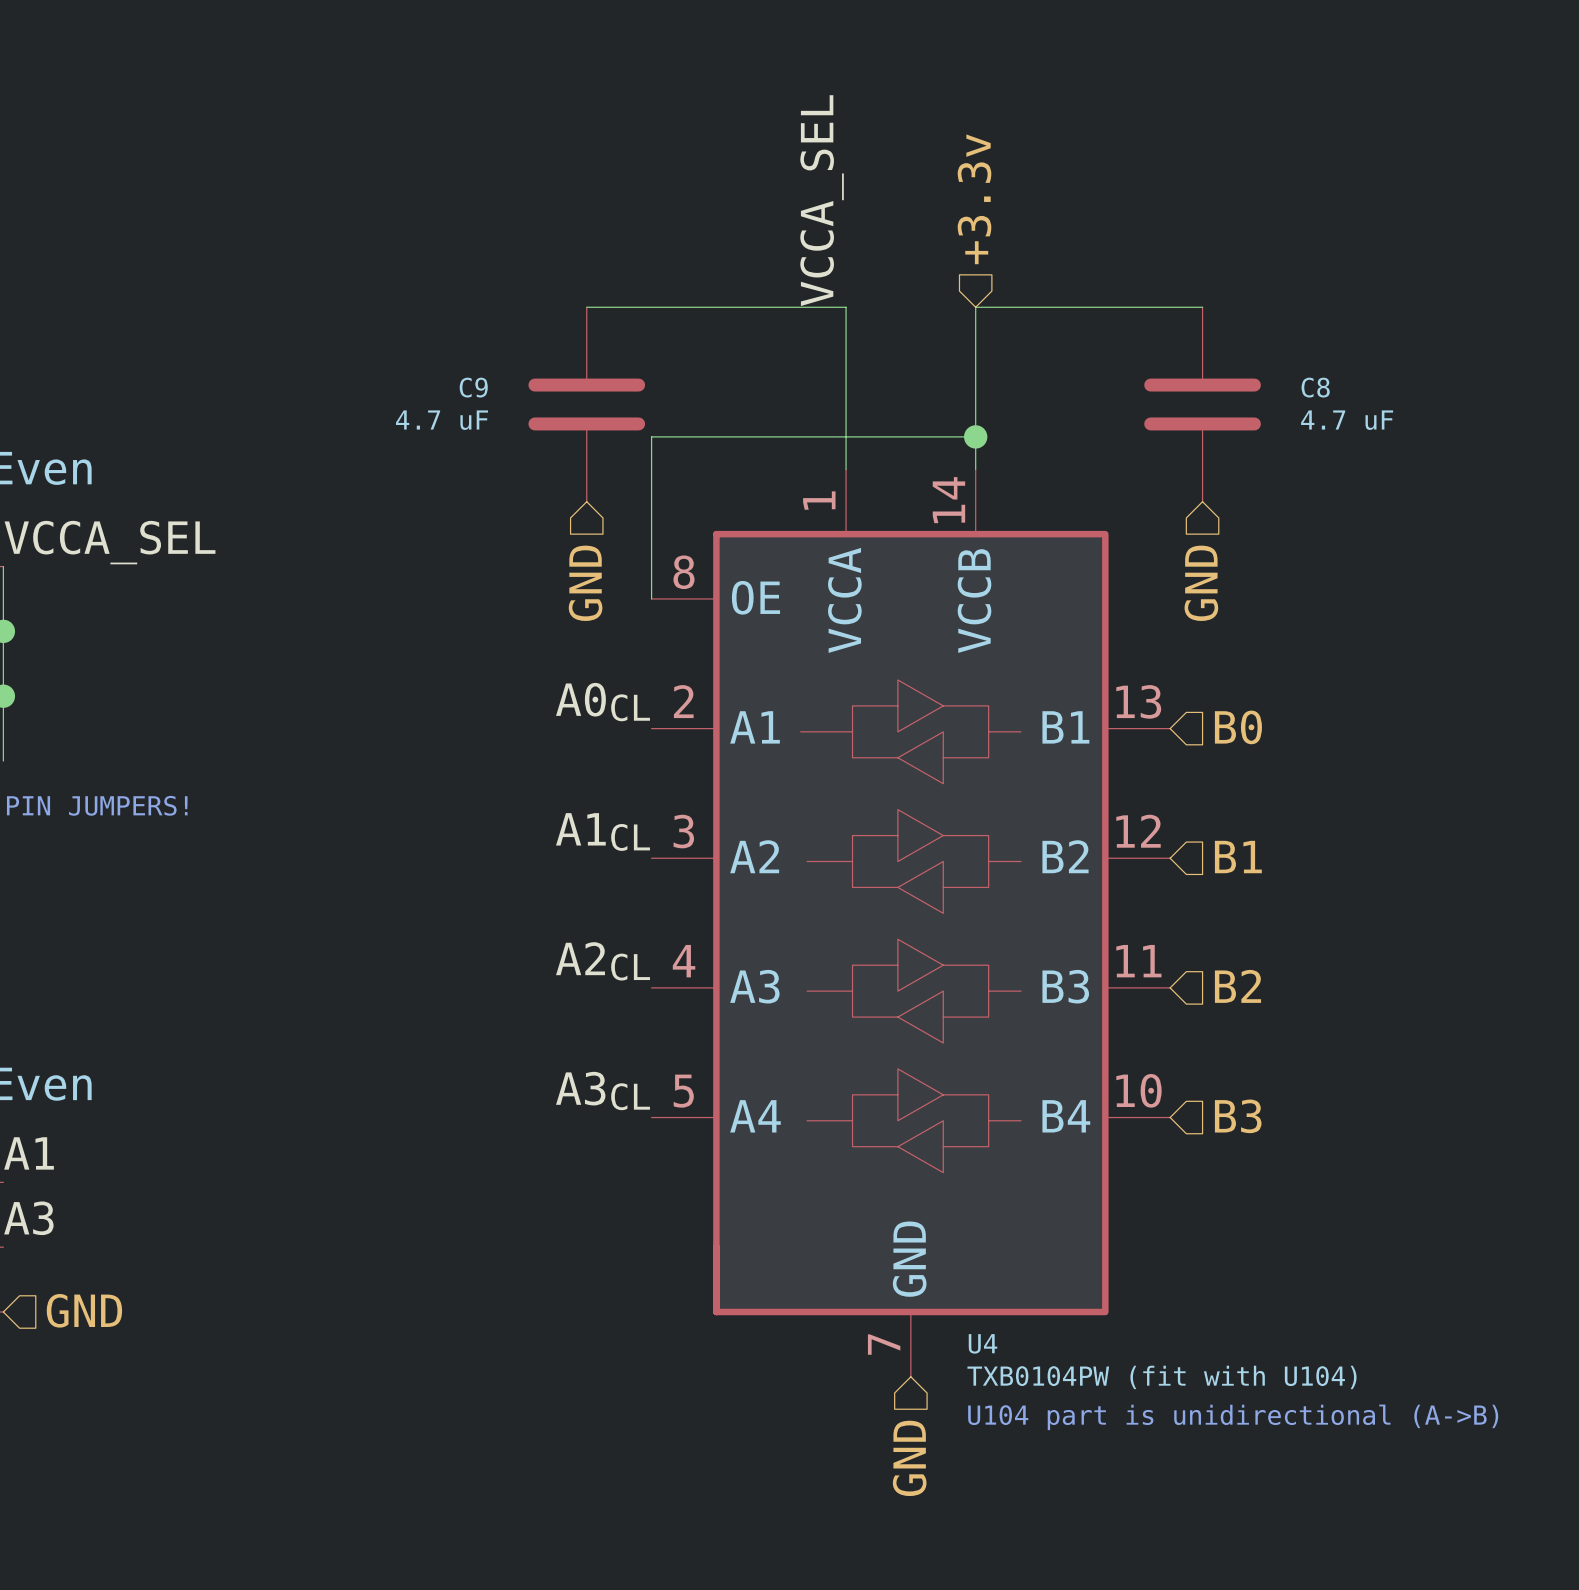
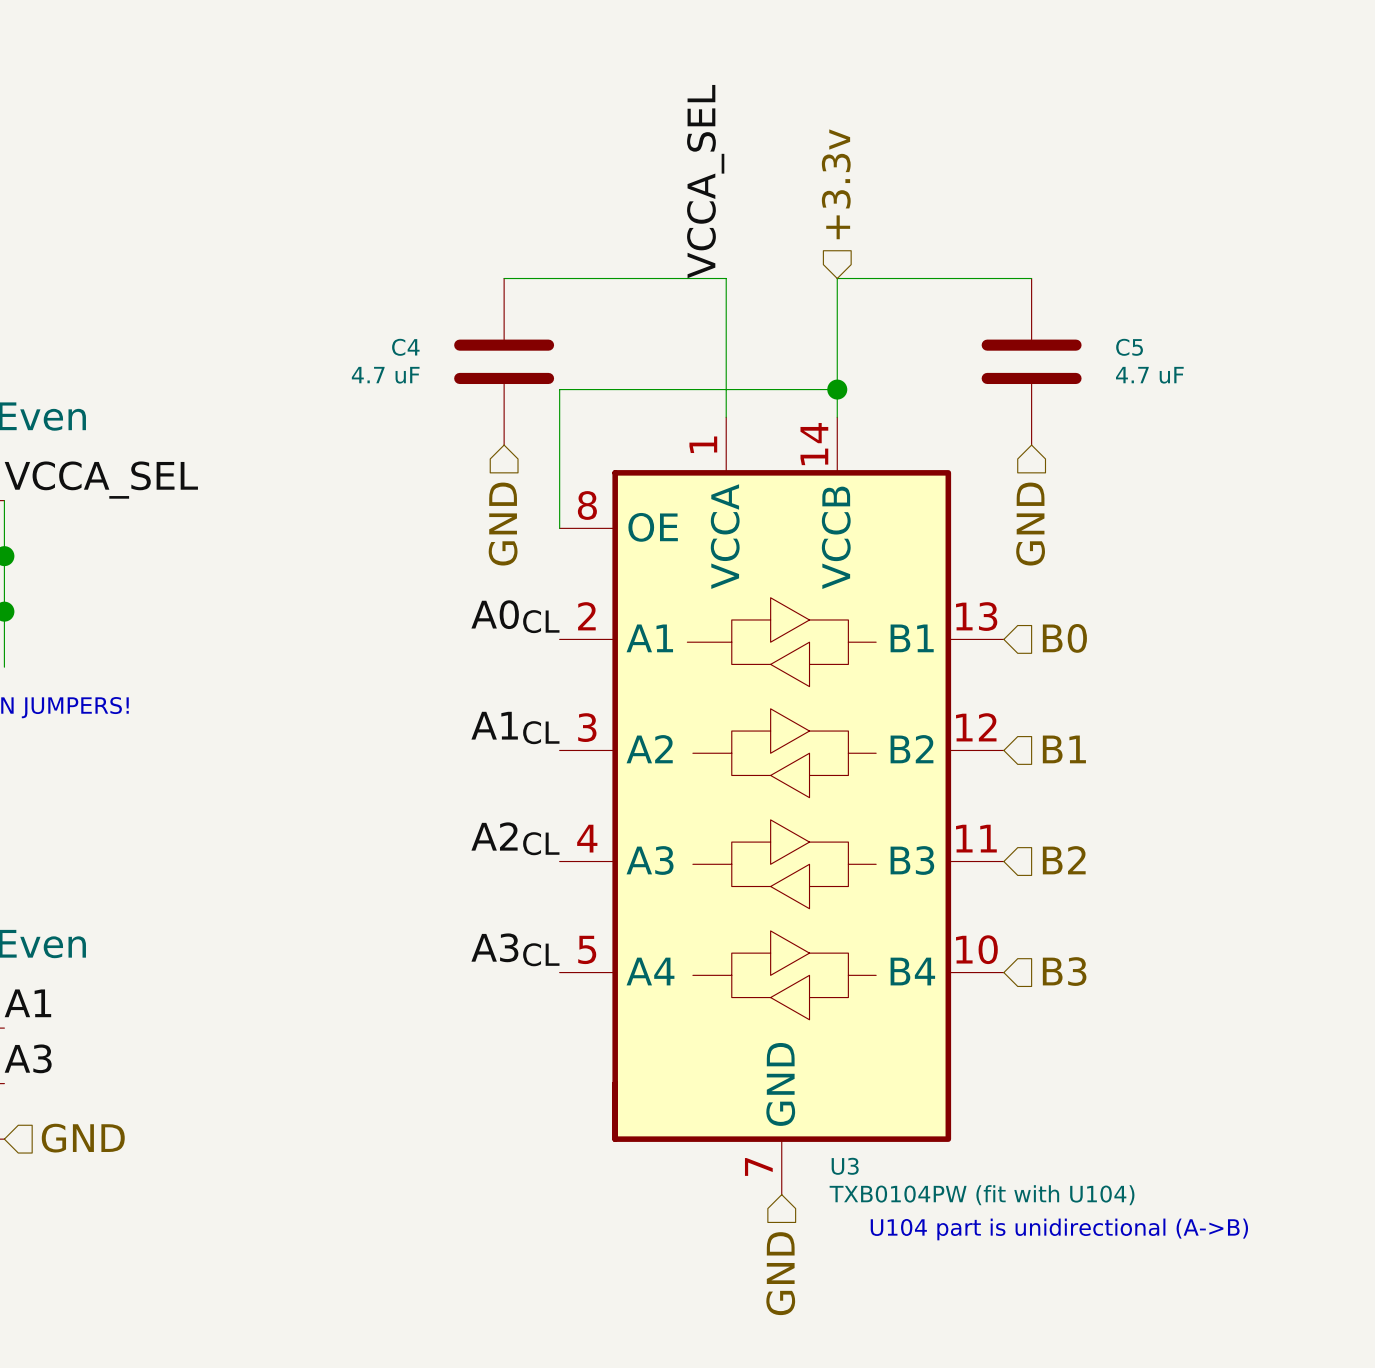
C9 name: C9 (473, 387) -> C4 (405, 347)
C8 name: C8 (1315, 387) -> C5 (1129, 347)
U4 name: U4 (982, 1343) -> U3 (845, 1166)

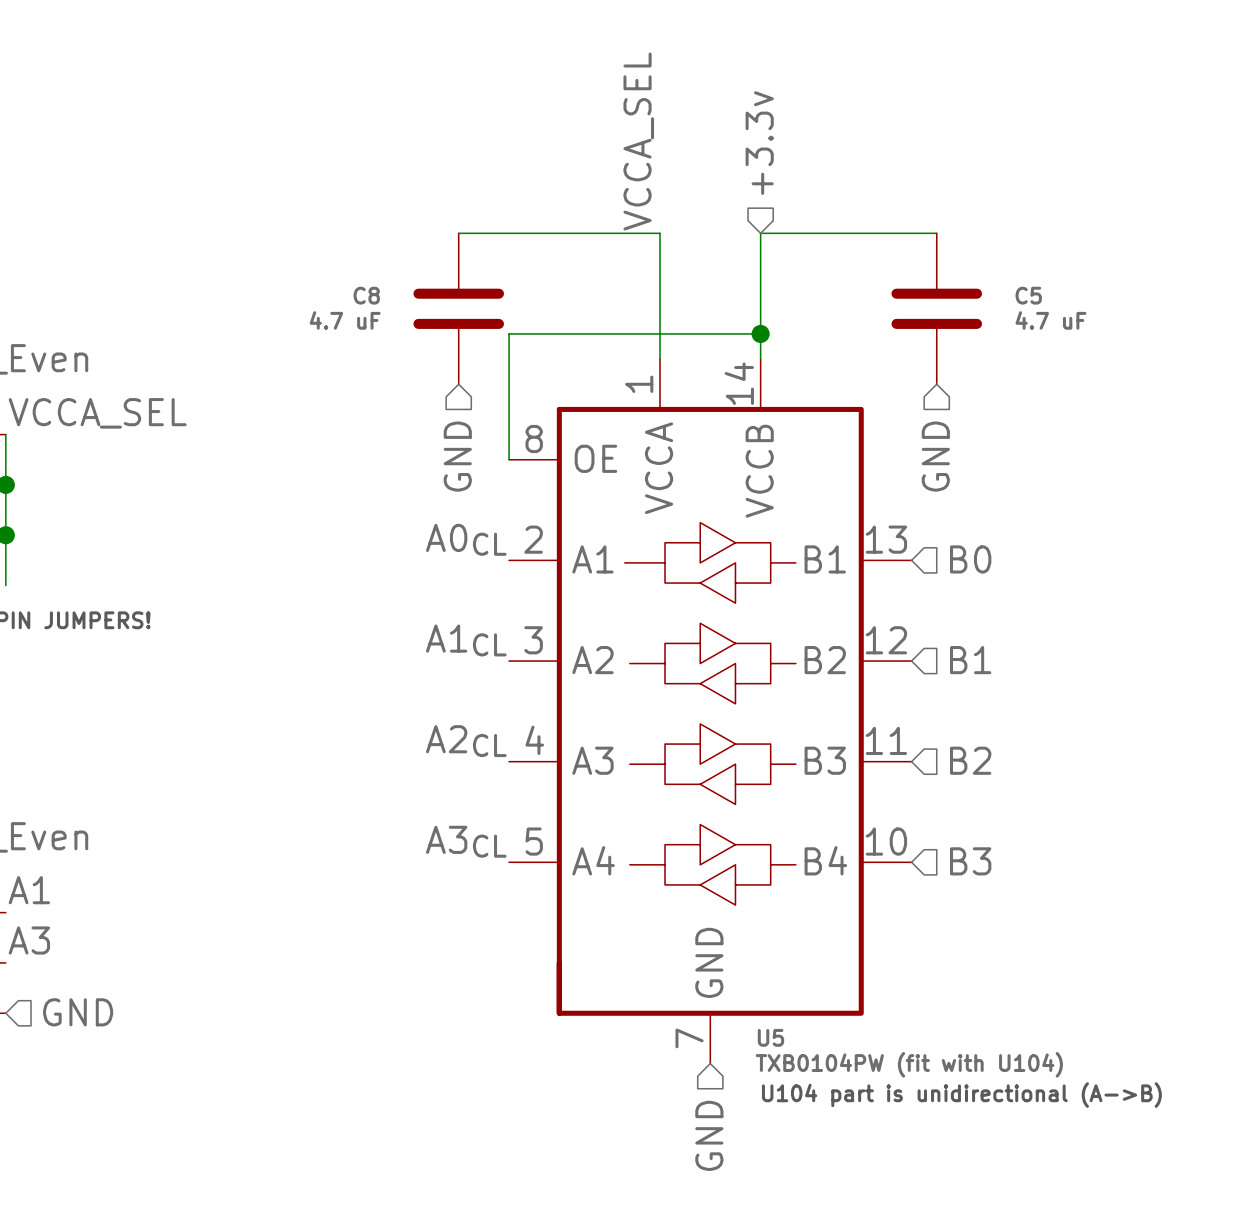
C4 name: C4 (405, 347) -> C8 (366, 295)
U3 name: U3 (845, 1166) -> U5 (770, 1037)

